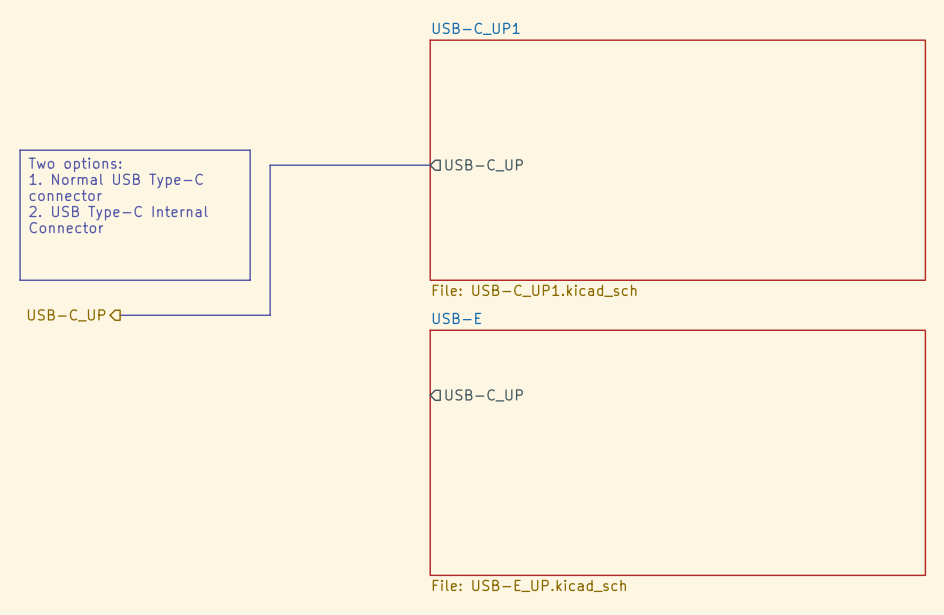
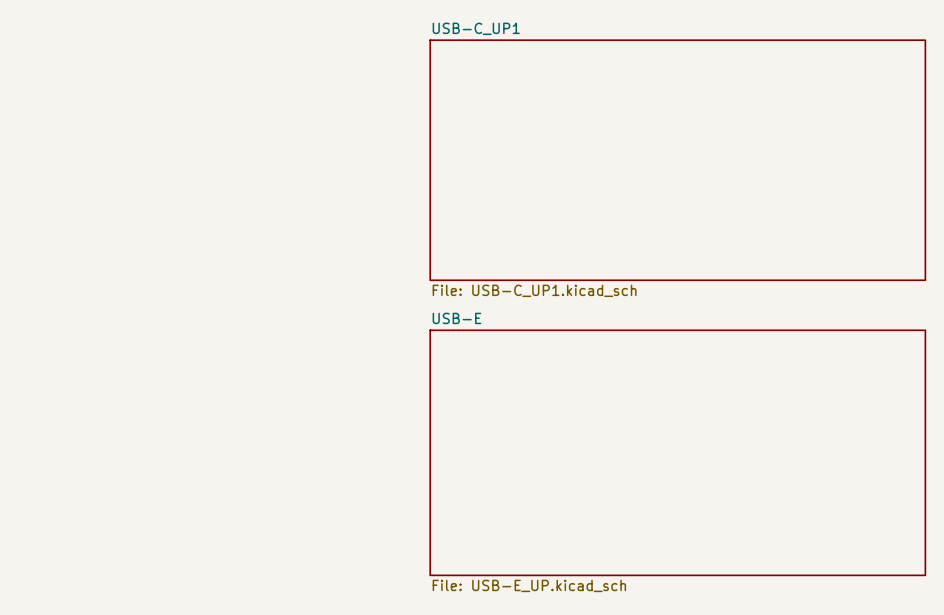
line: (20, 150) (250, 150) (250, 280) (20, 280) (20, 150) -> none
text: Two options: (75, 164) -> none
bus: (430, 165) (270, 165) (270, 315) (120, 315) -> none
sheet pin: USB-C_UP (484, 165) -> none
text: 1. Normal USB Type-C (116, 180) -> none
text: connector (65, 195) -> none
text: 2. USB Type-C Internal (118, 213) -> none
text: Connector (66, 227) -> none
hierarchical label: USB-C_UP (66, 315) -> none
sheet pin: USB-C_UP (484, 395) -> none

